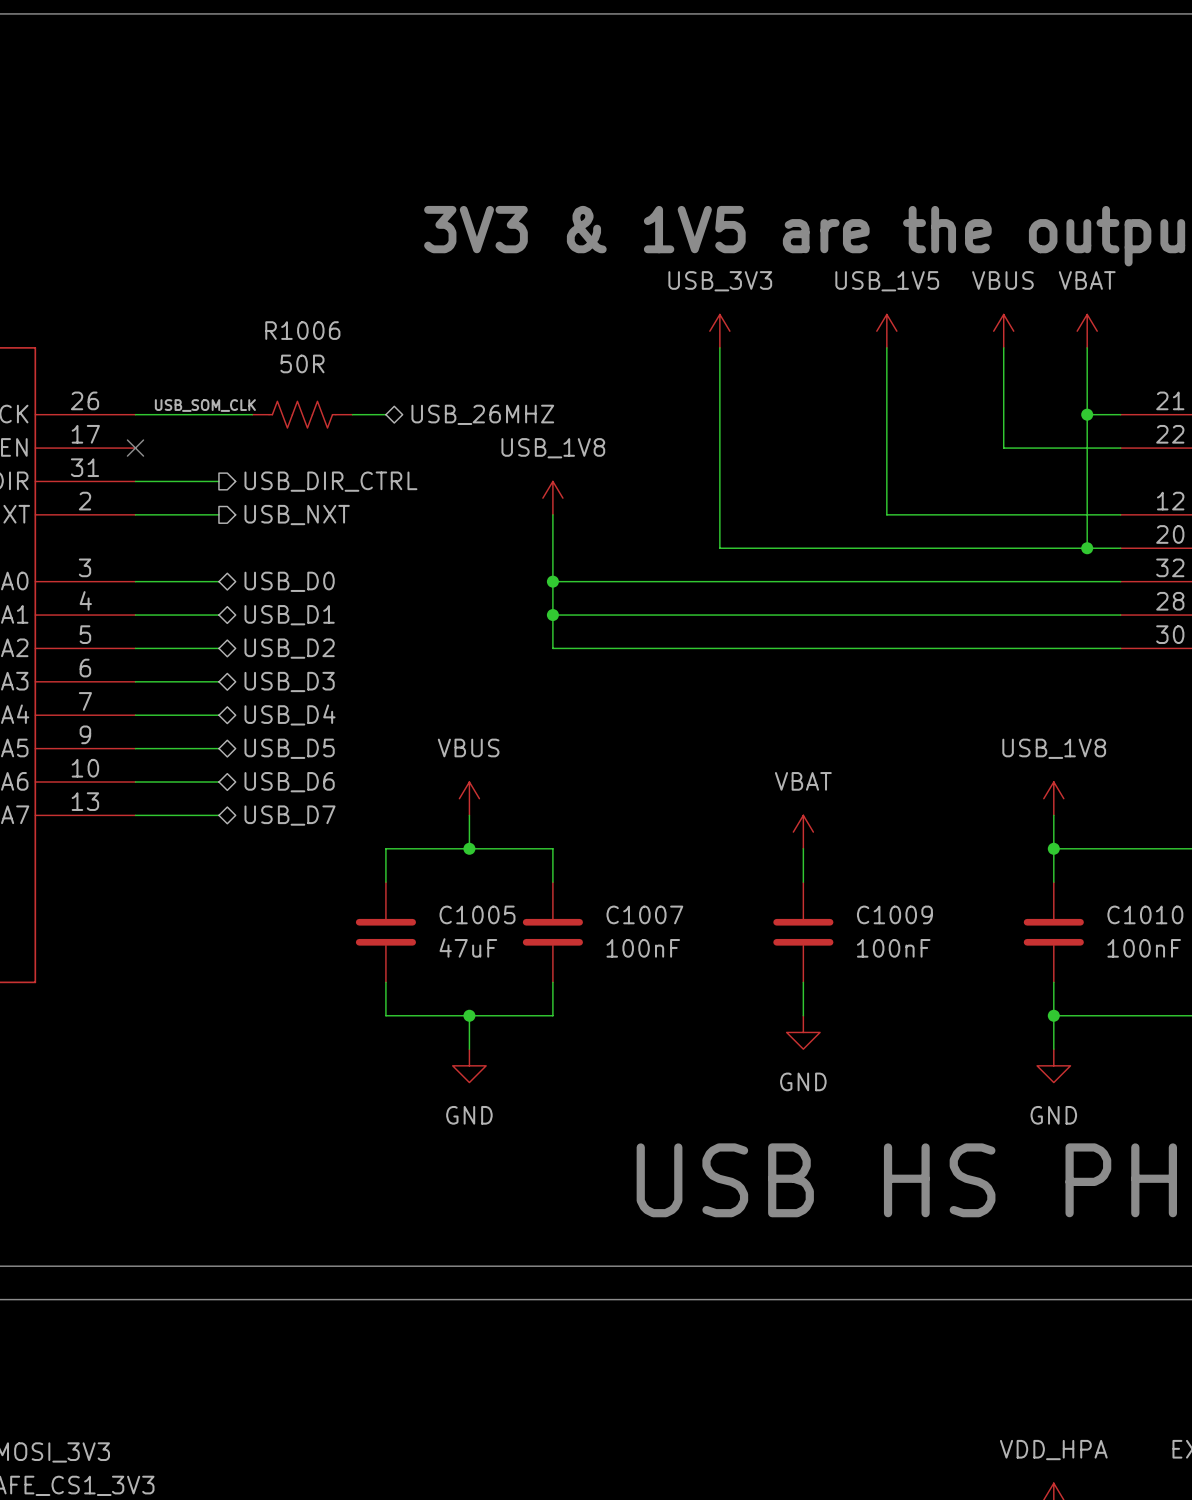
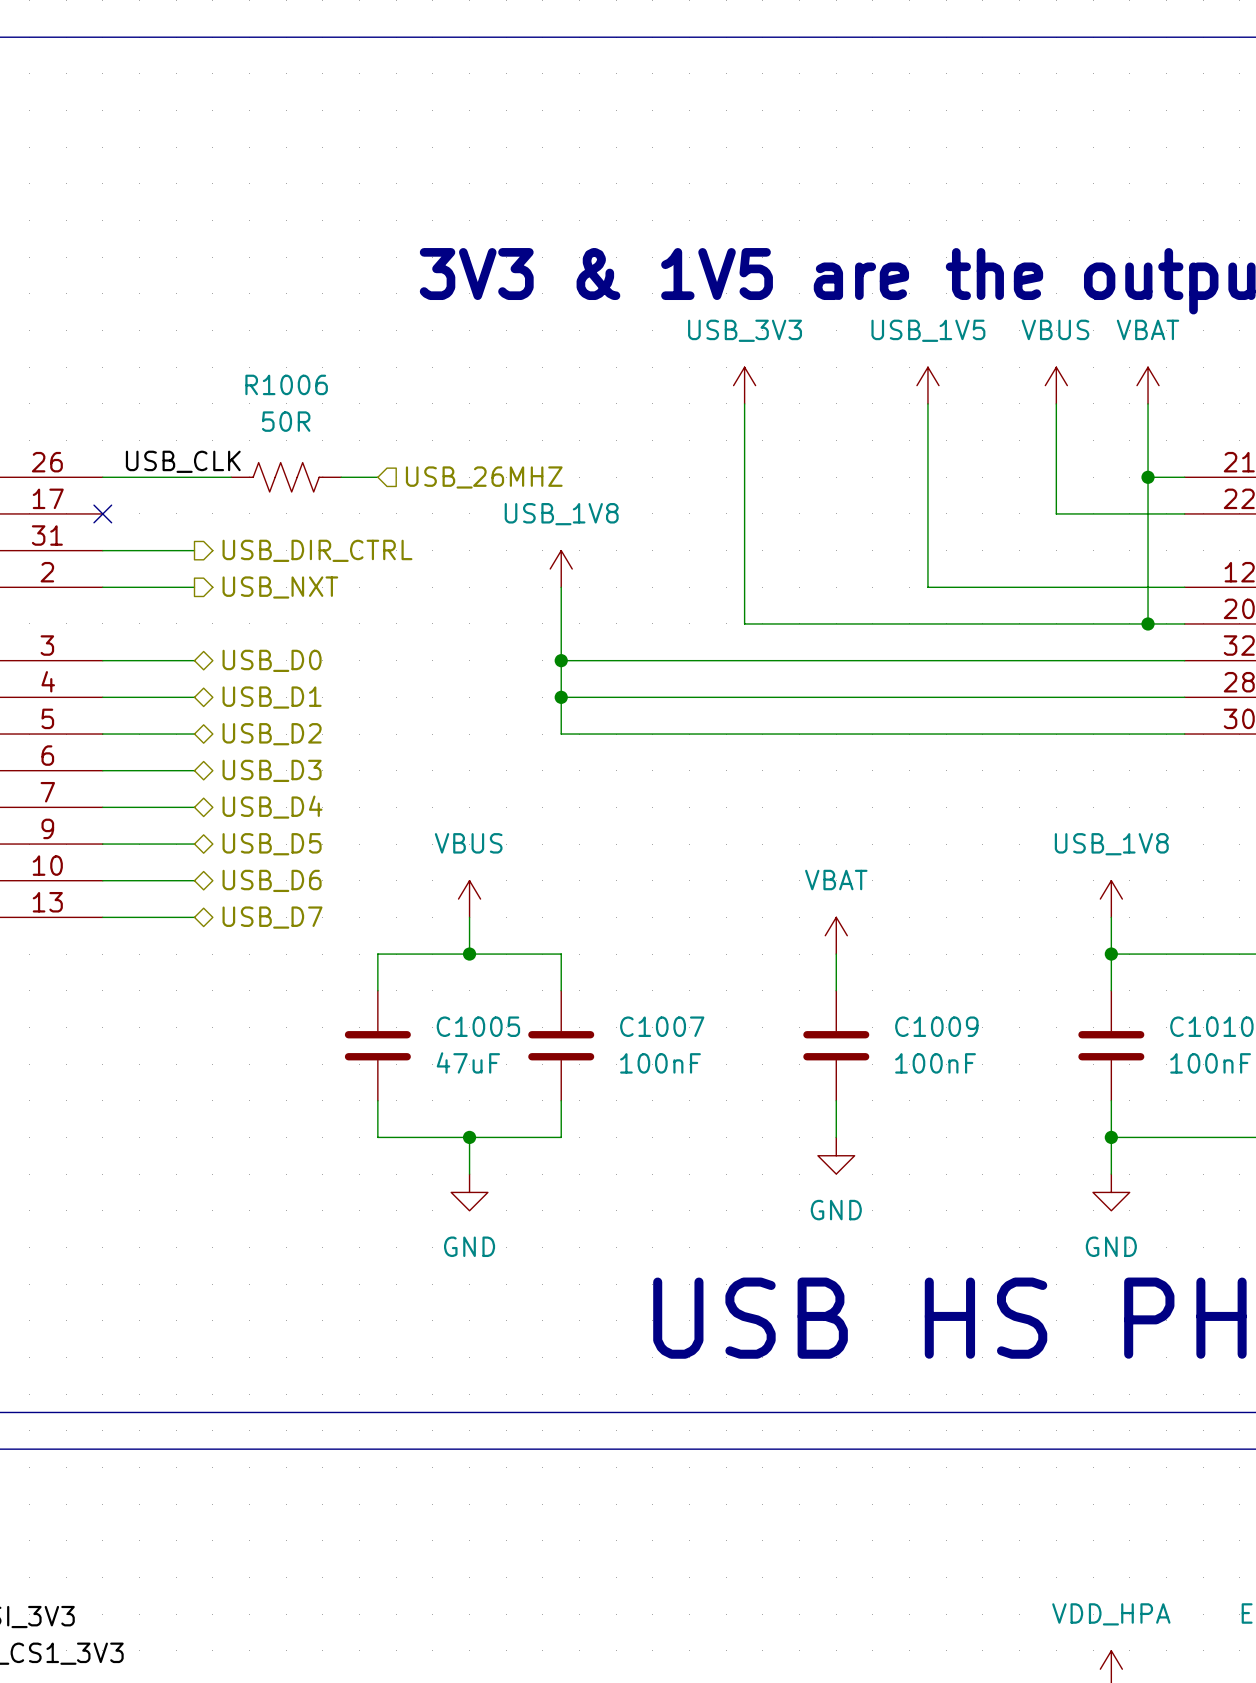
label: USB_SOM_CLK (205, 405) -> USB_CLK (183, 461)
hierarchical label shape: bidirectional (482, 414) -> input (484, 477)

